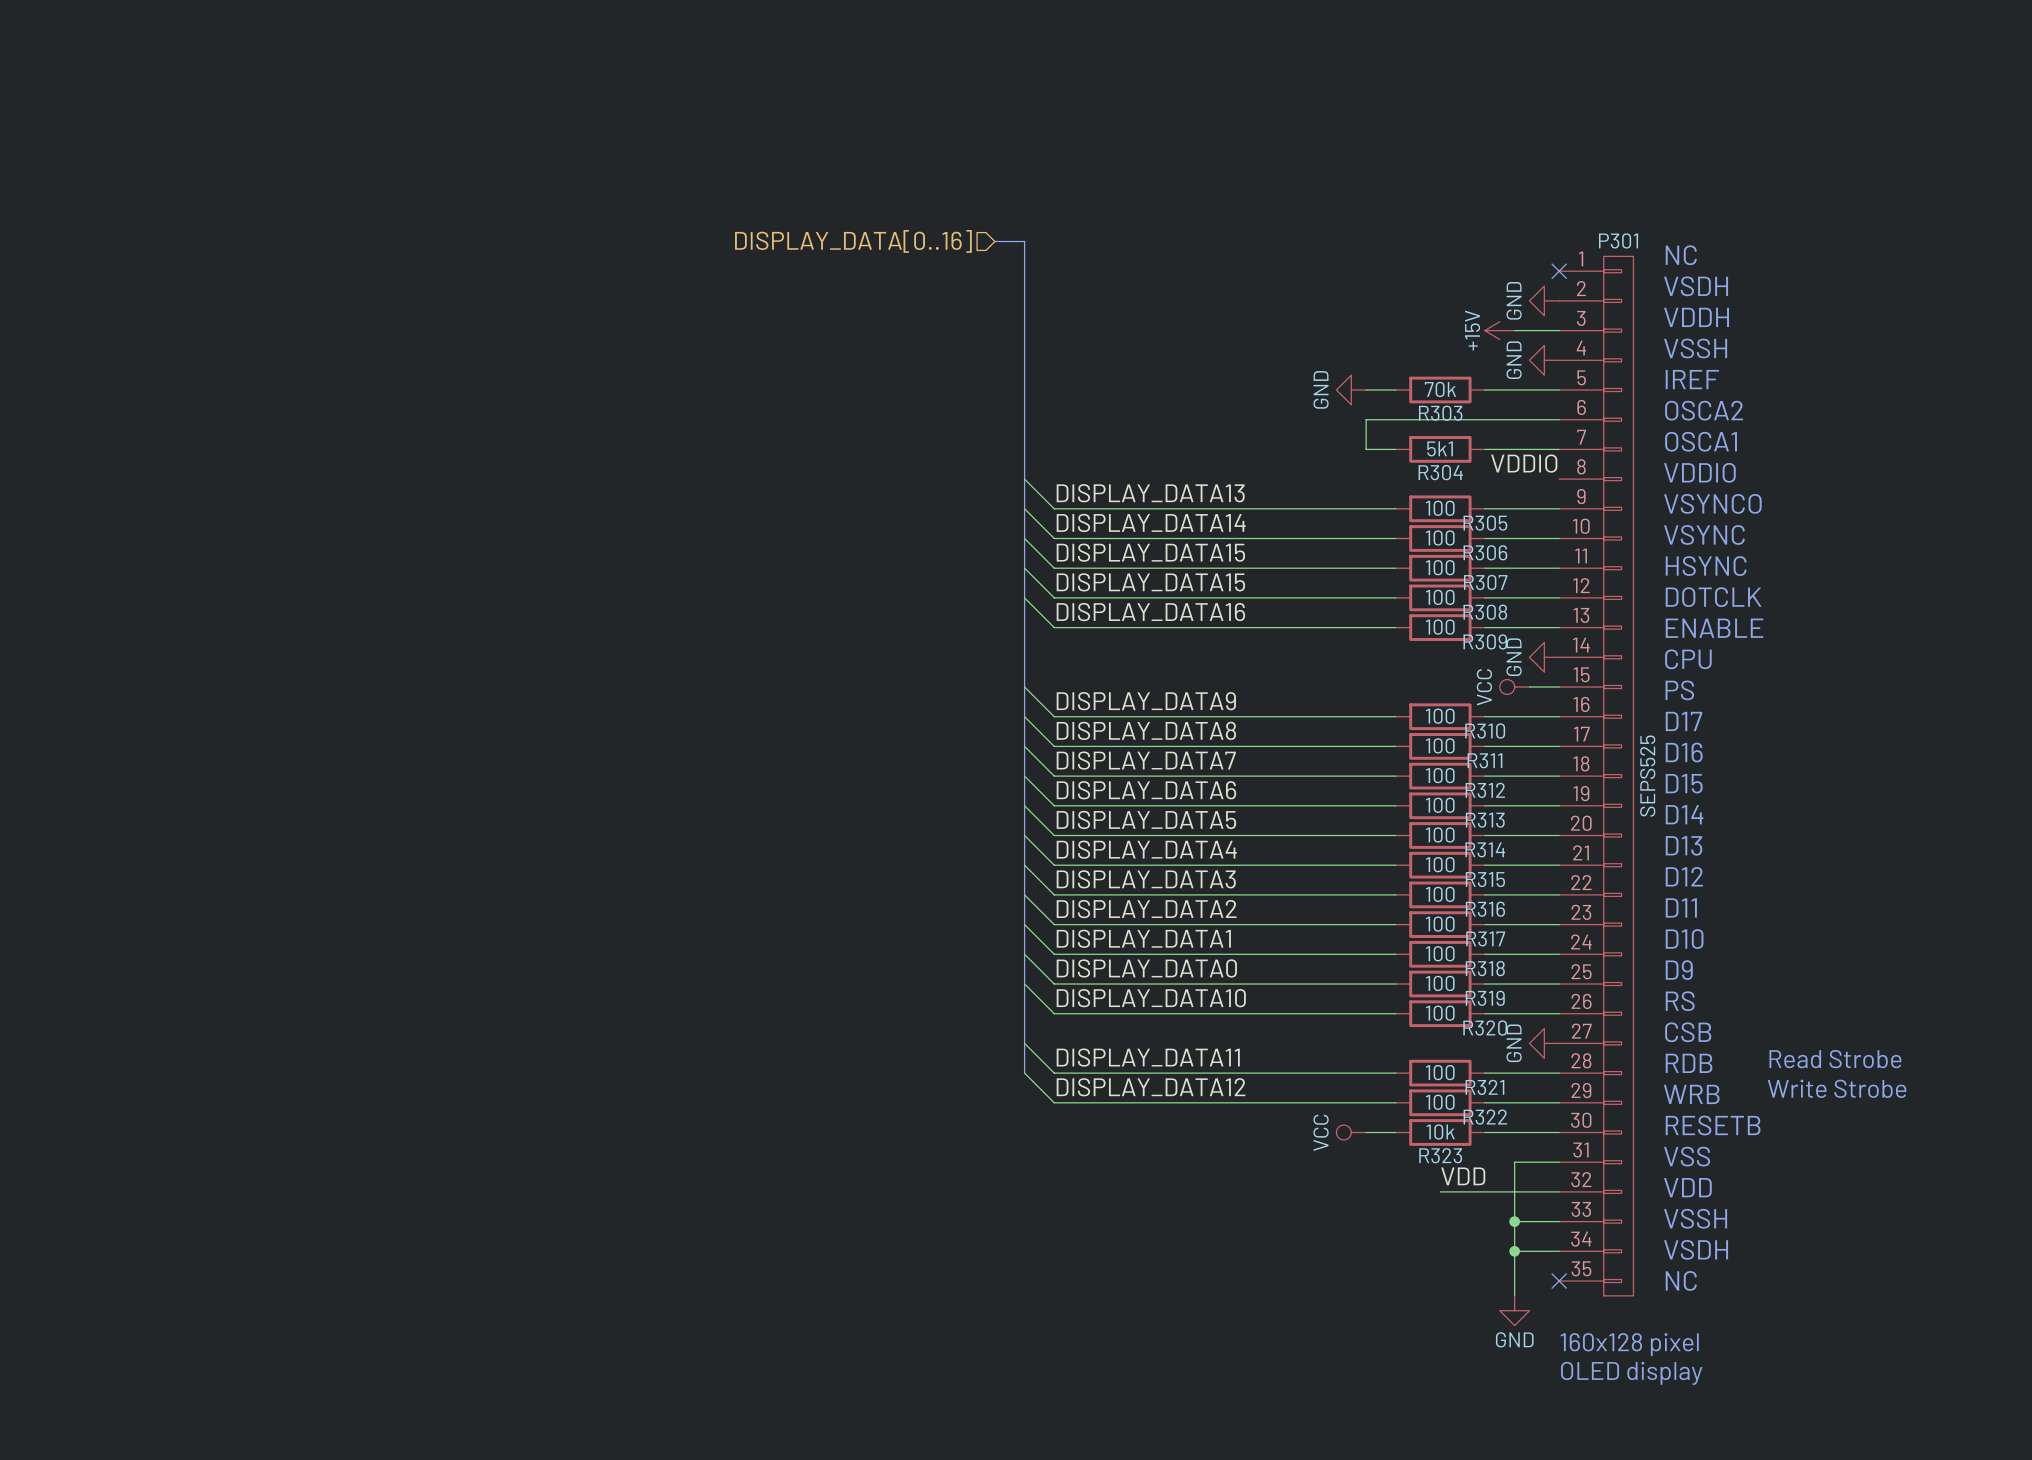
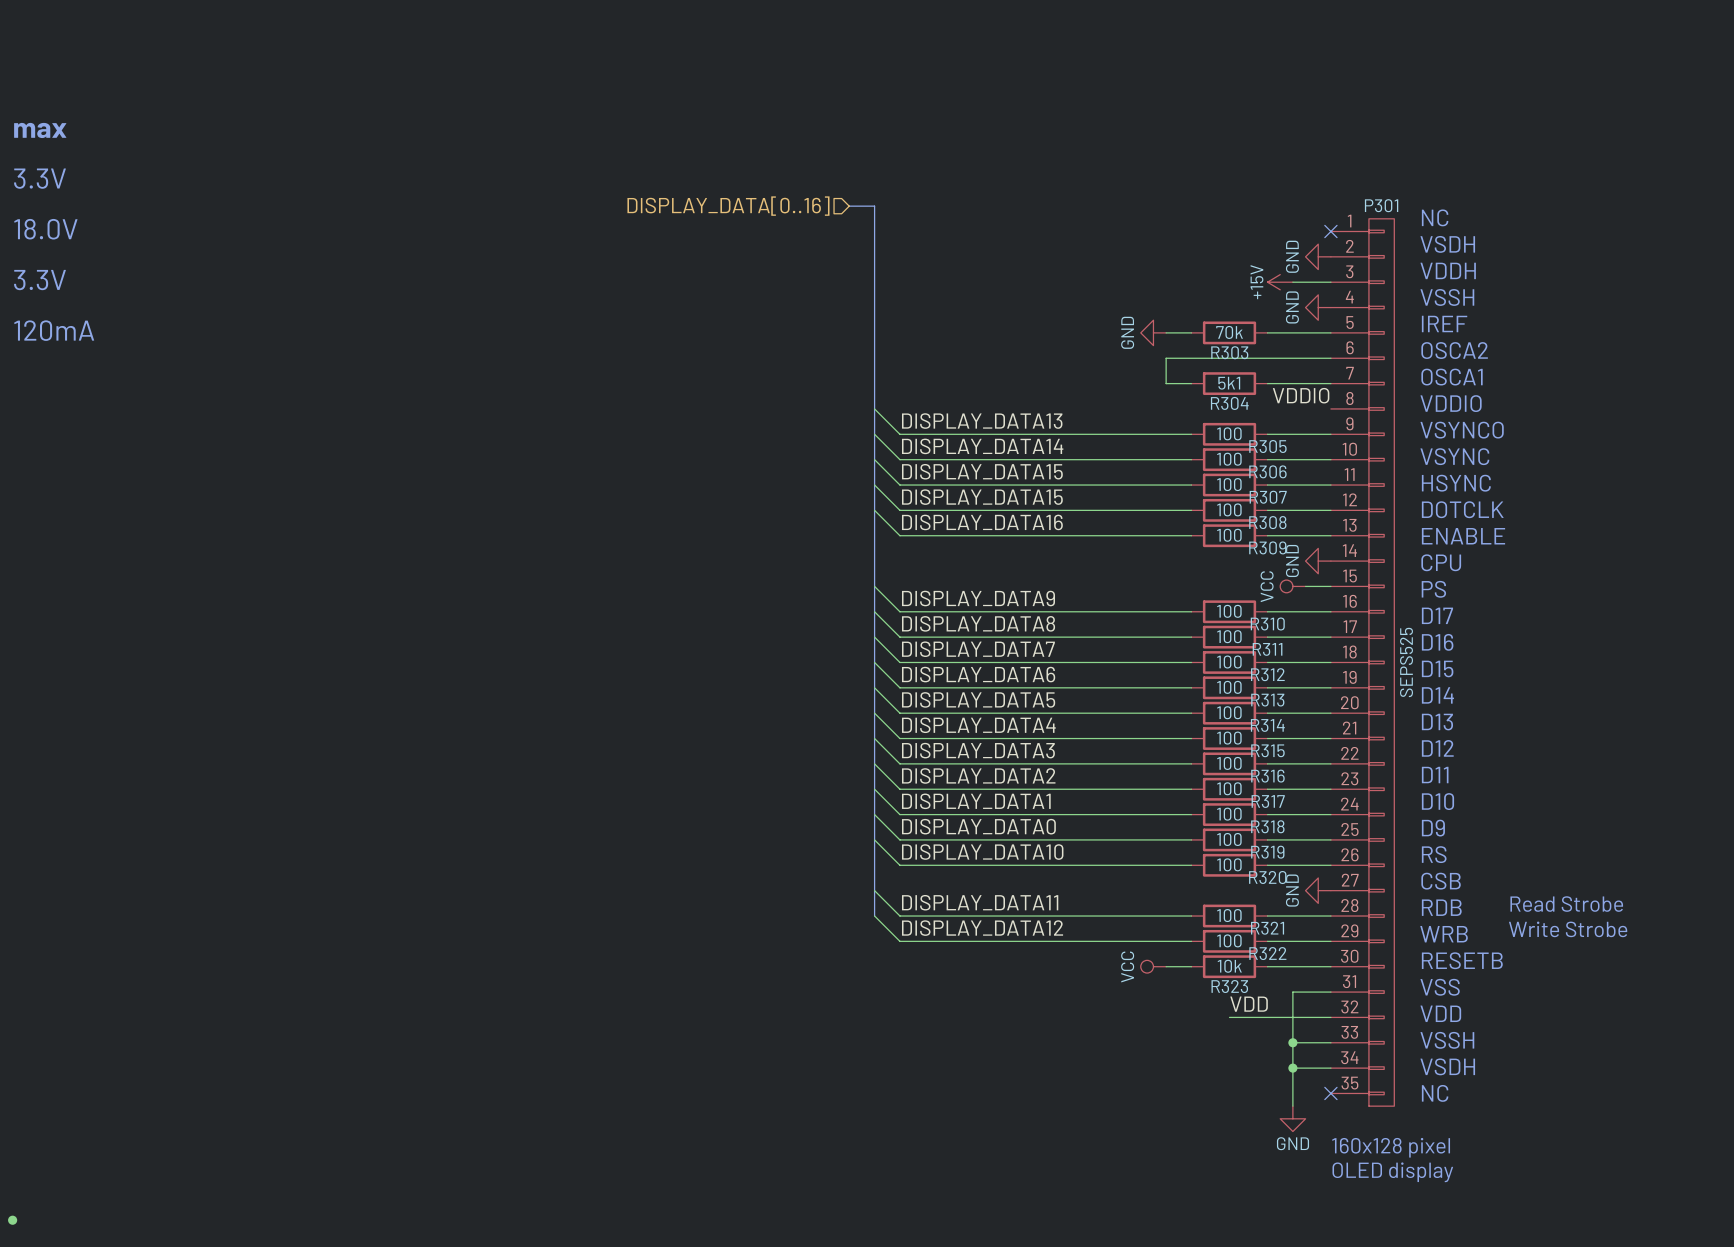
text: none -> max (40, 130)
text: none -> 3.3V (40, 178)
text: none -> 18.0V (45, 229)
text: none -> 3.3V (40, 280)
text: none -> 120mA (54, 330)
junction: none -> (12, 1220)

